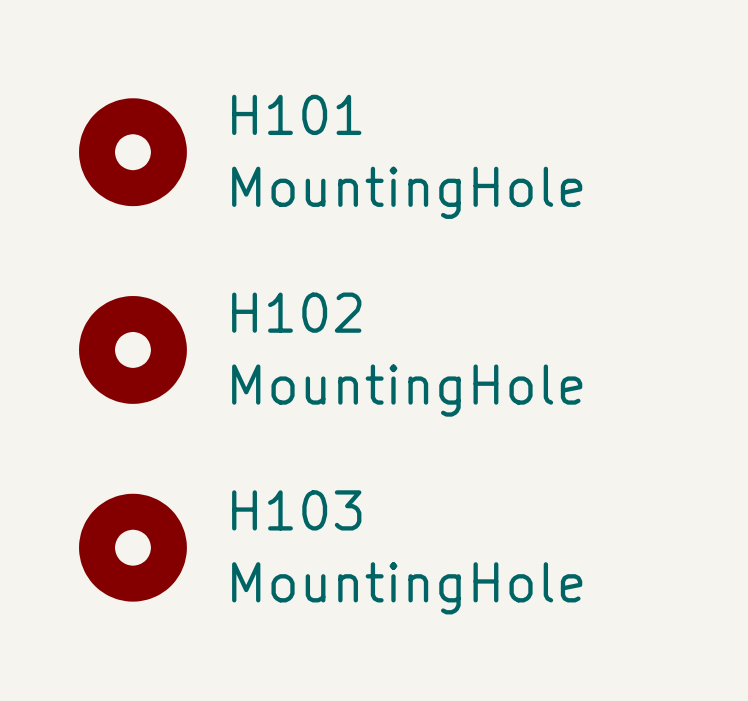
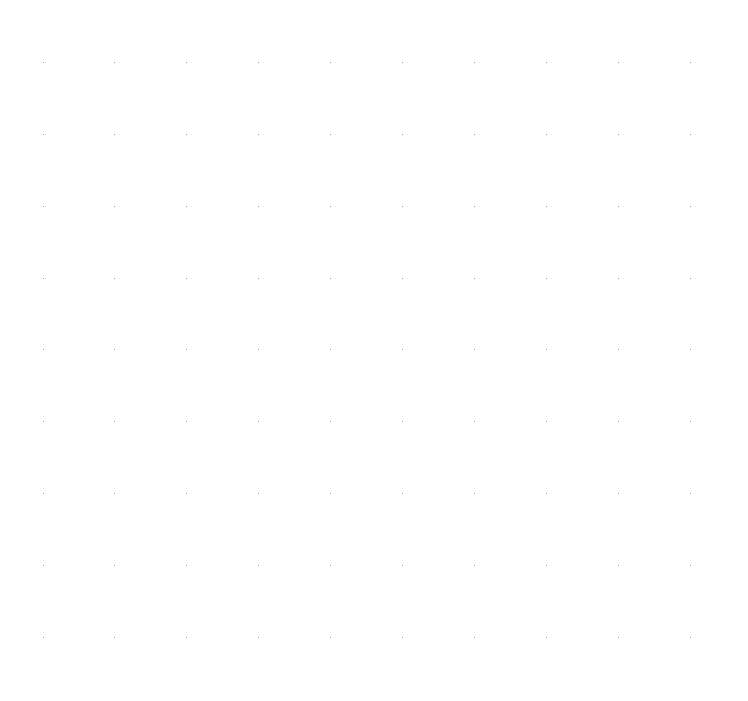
H101: MountingHole (132, 152) -> none
H102: MountingHole (132, 349) -> none
H103: MountingHole (132, 547) -> none

